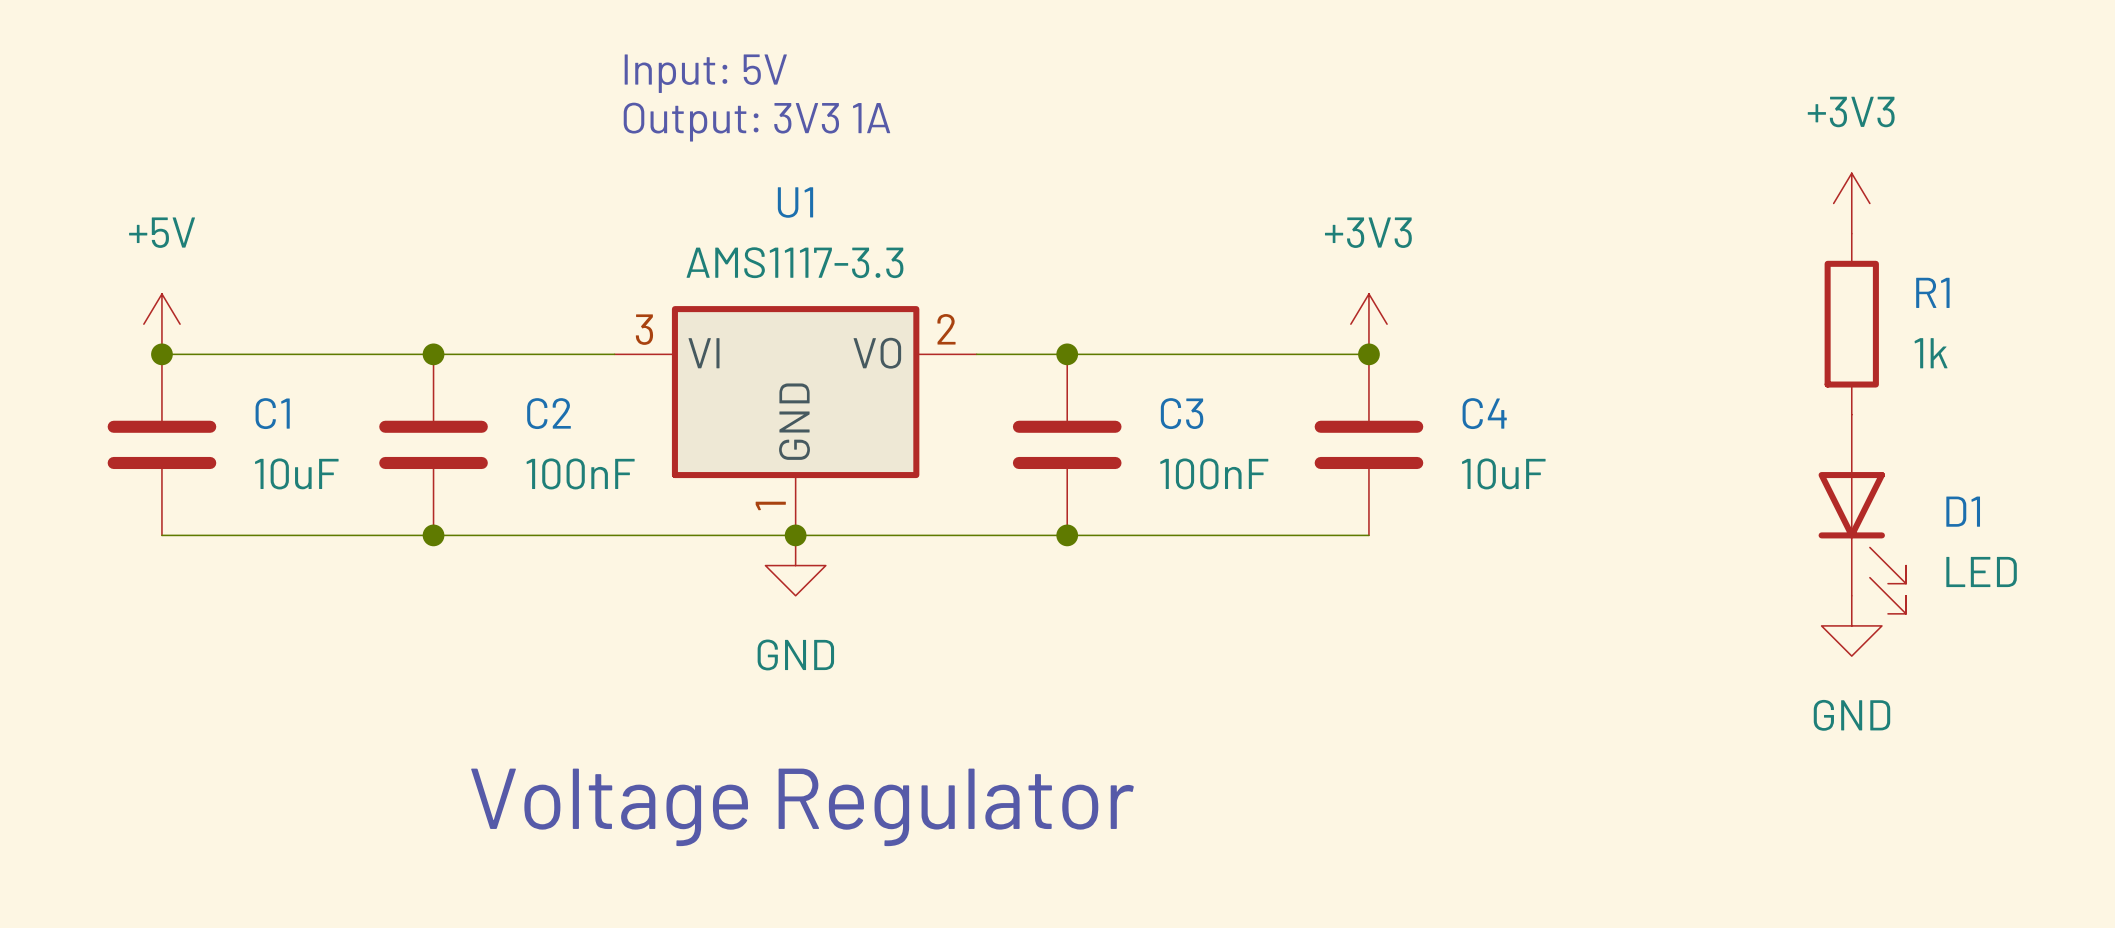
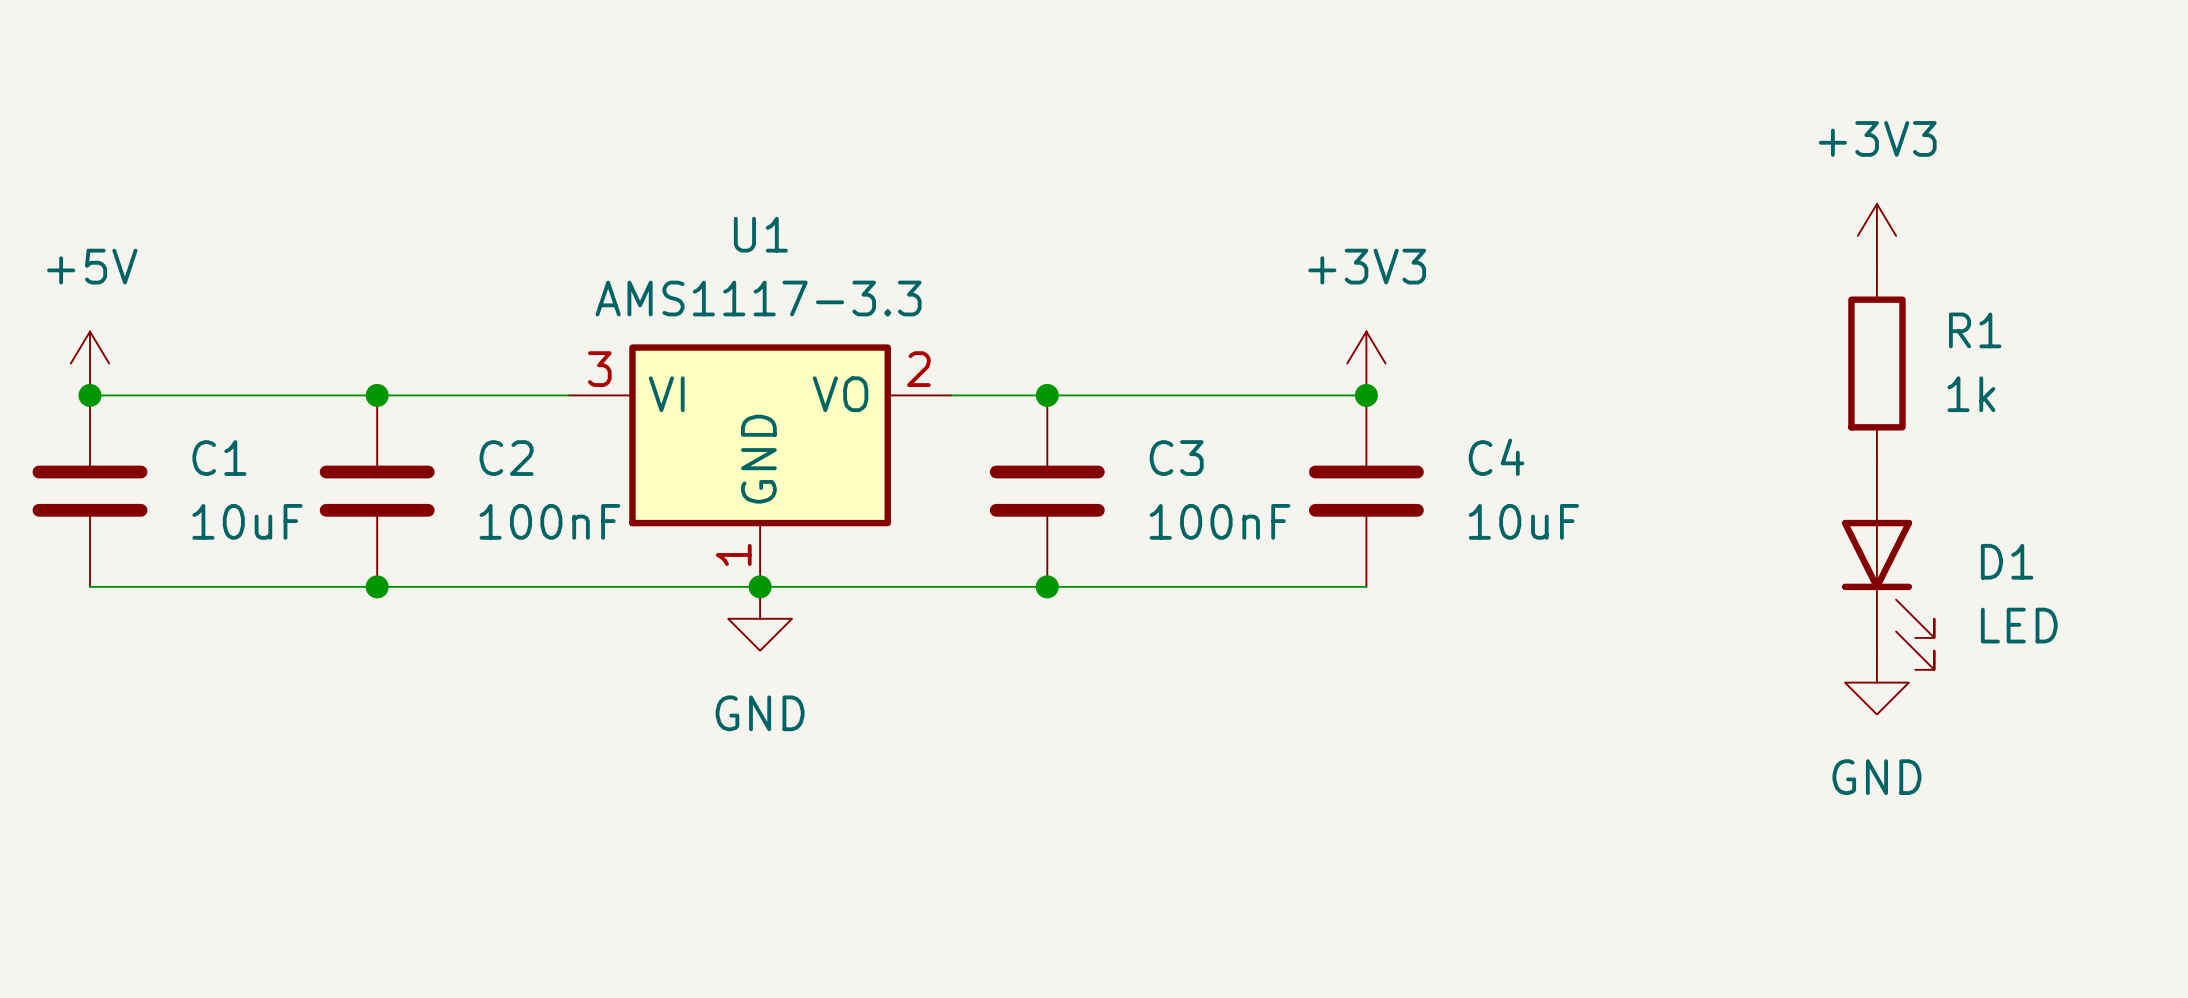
text: Input: 5V (705, 73) -> none
text: Output: 3V3 1A (756, 122) -> none
text: Voltage Regulator (802, 807) -> none

